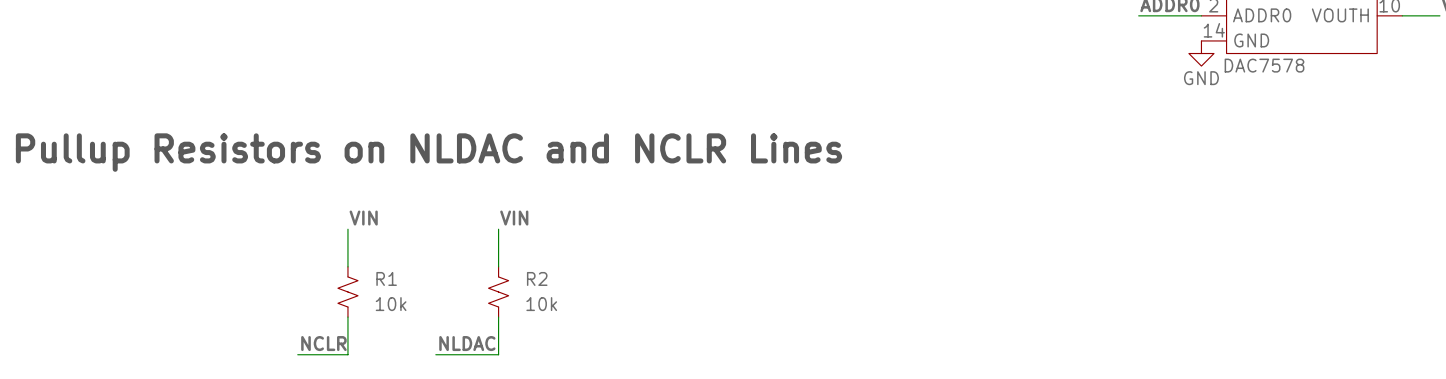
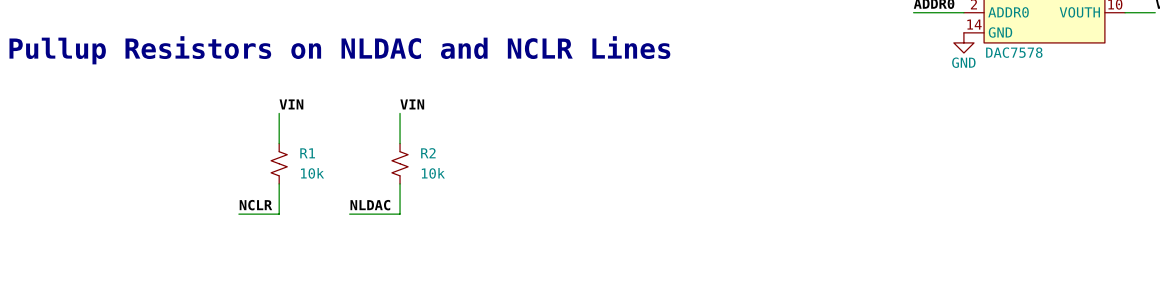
label: none -> VIN (291, 104)
label: none -> VIN (412, 104)
wire: none -> (279, 113) (279, 143)
wire: none -> (400, 113) (400, 143)
text position: Pullup Resistors on NLDAC and NCLR Lines (428, 152) -> Pullup Resistors on NLDAC and NCLR Lines (339, 50)
label: VIN (363, 218) -> none
label: VIN (514, 218) -> none
wire: none -> (238, 214) (279, 214)
wire: none -> (349, 214) (400, 214)
R1 position: (347, 291) -> (279, 163)
R2 position: (498, 291) -> (400, 163)
wire: (347, 317) (347, 354) (297, 354) -> none
wire: (498, 317) (498, 354) (435, 354) -> none
label position: NCLR (323, 343) -> NCLR (255, 205)
label position: NLDAC (467, 343) -> NLDAC (370, 205)

